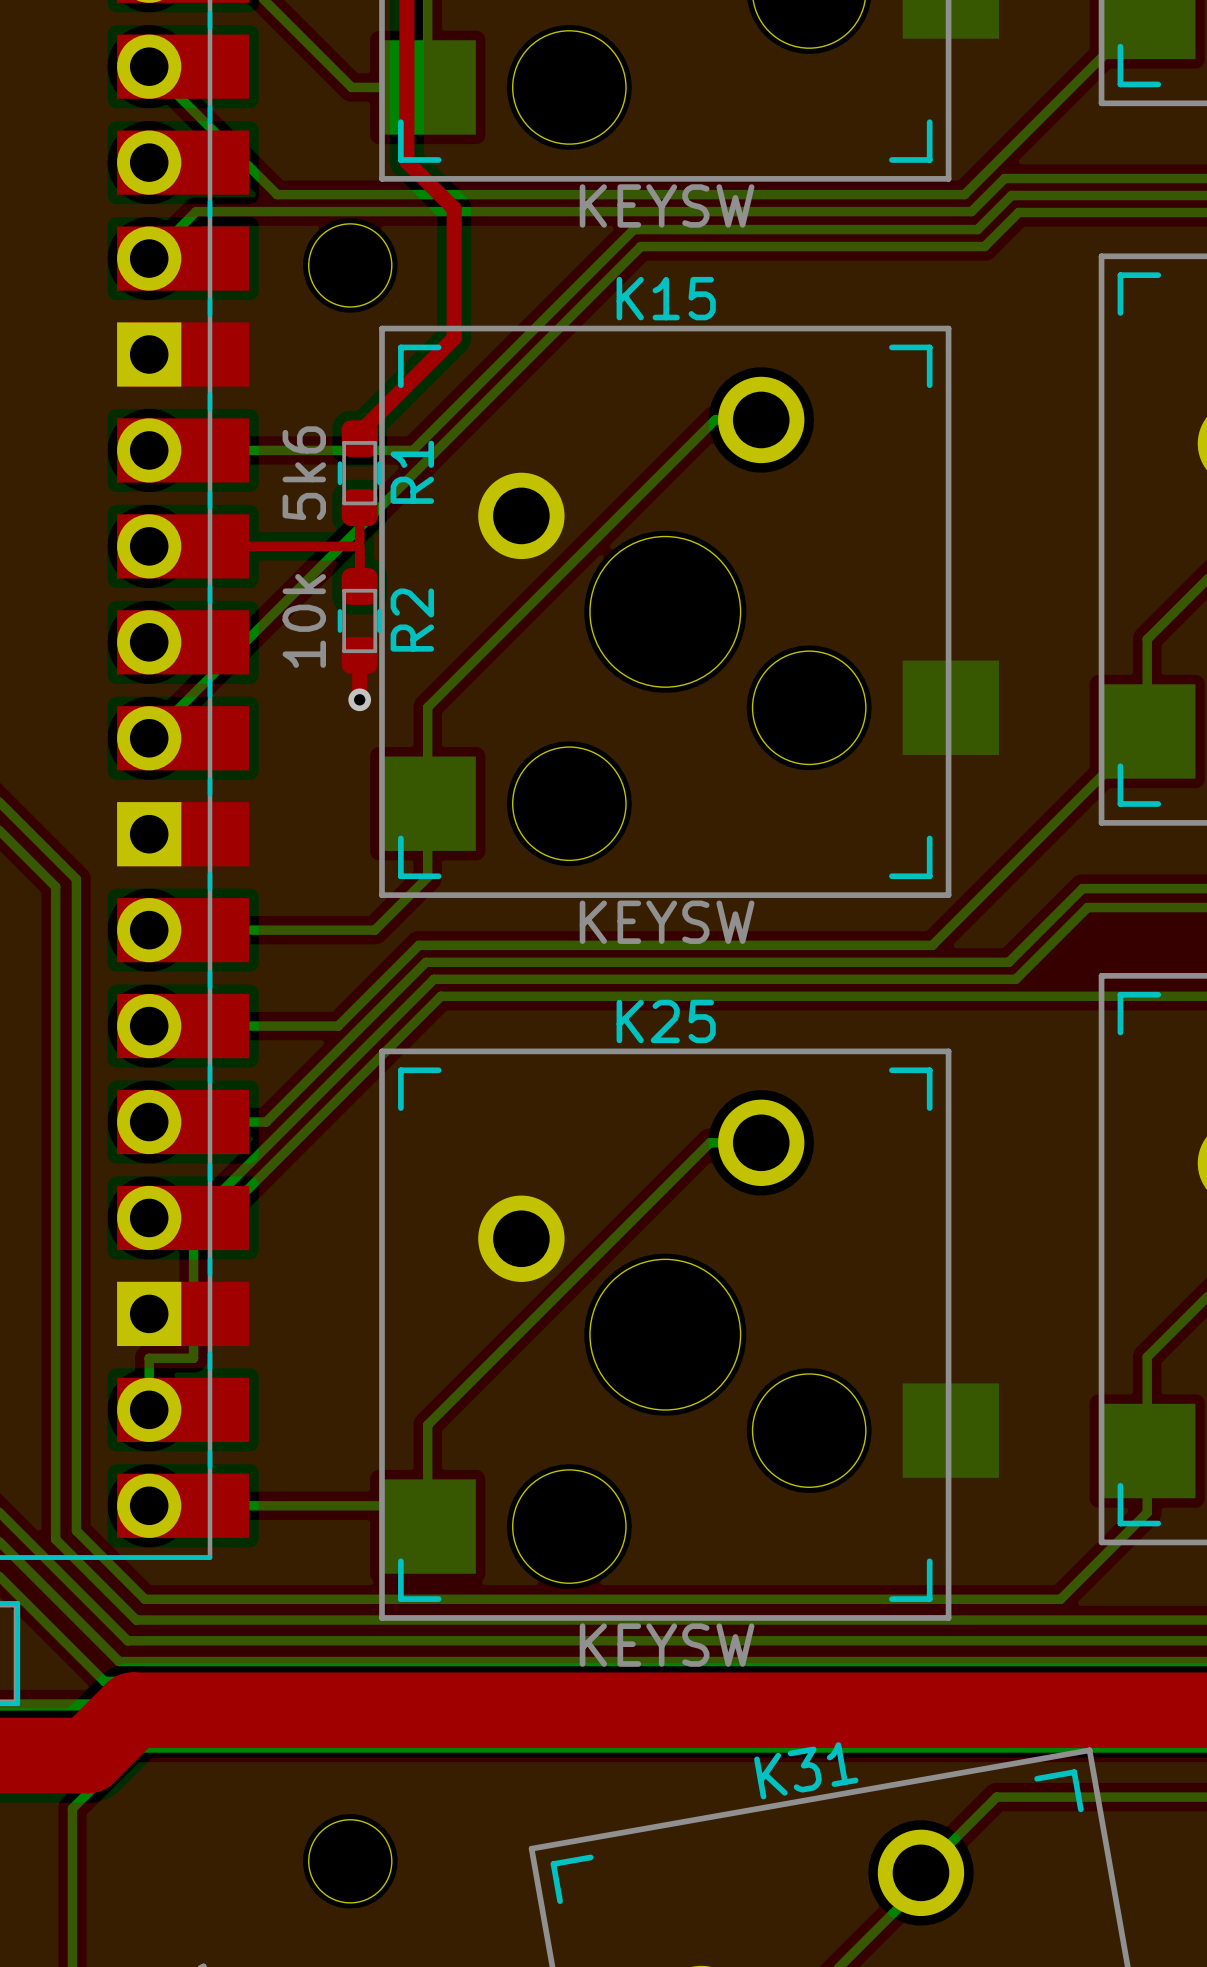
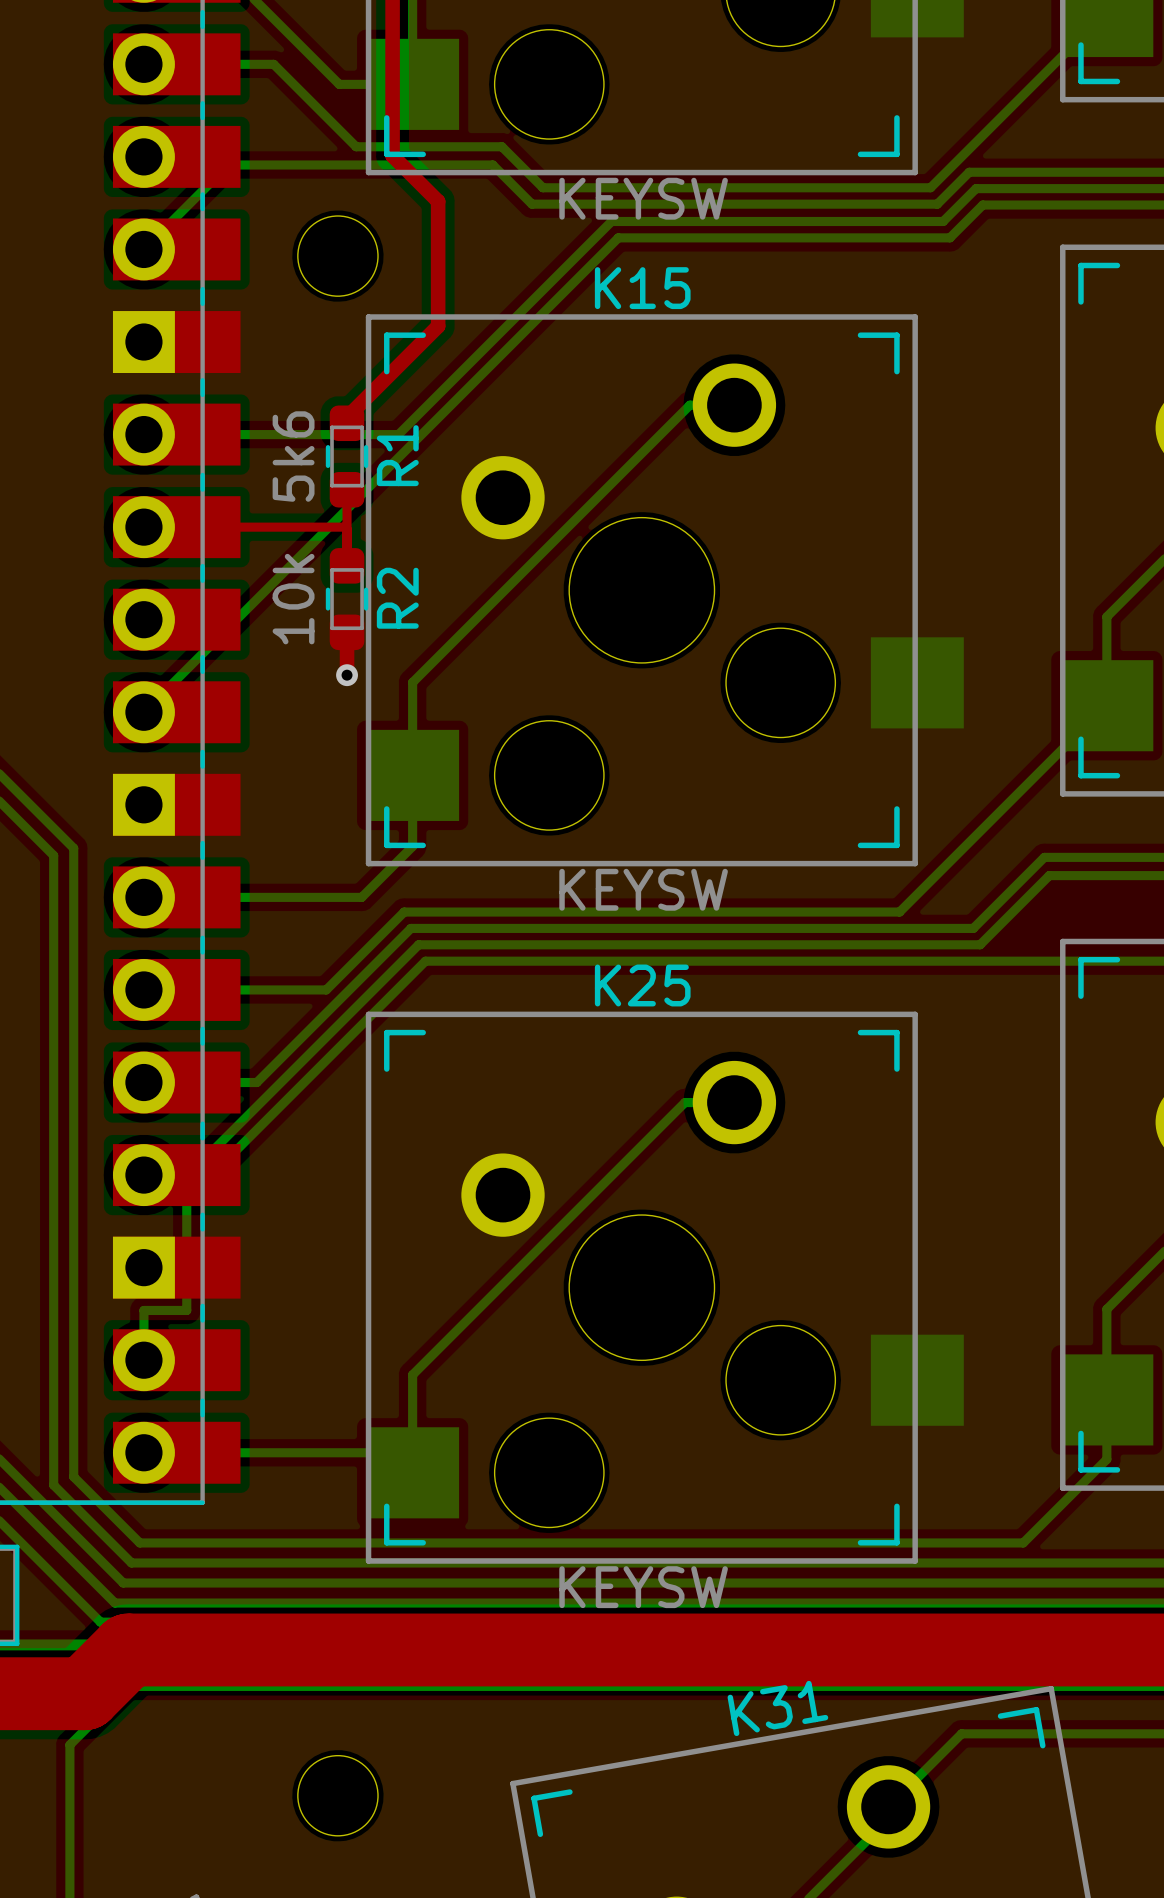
bottom track: (149, 66) (277, 194) (562, 194) -> (143, 64) (273, 64) (356, 146) (501, 146) (542, 187)
bottom track: (196, 211) (551, 211) -> (189, 204) (228, 164) (492, 164) (531, 204)

